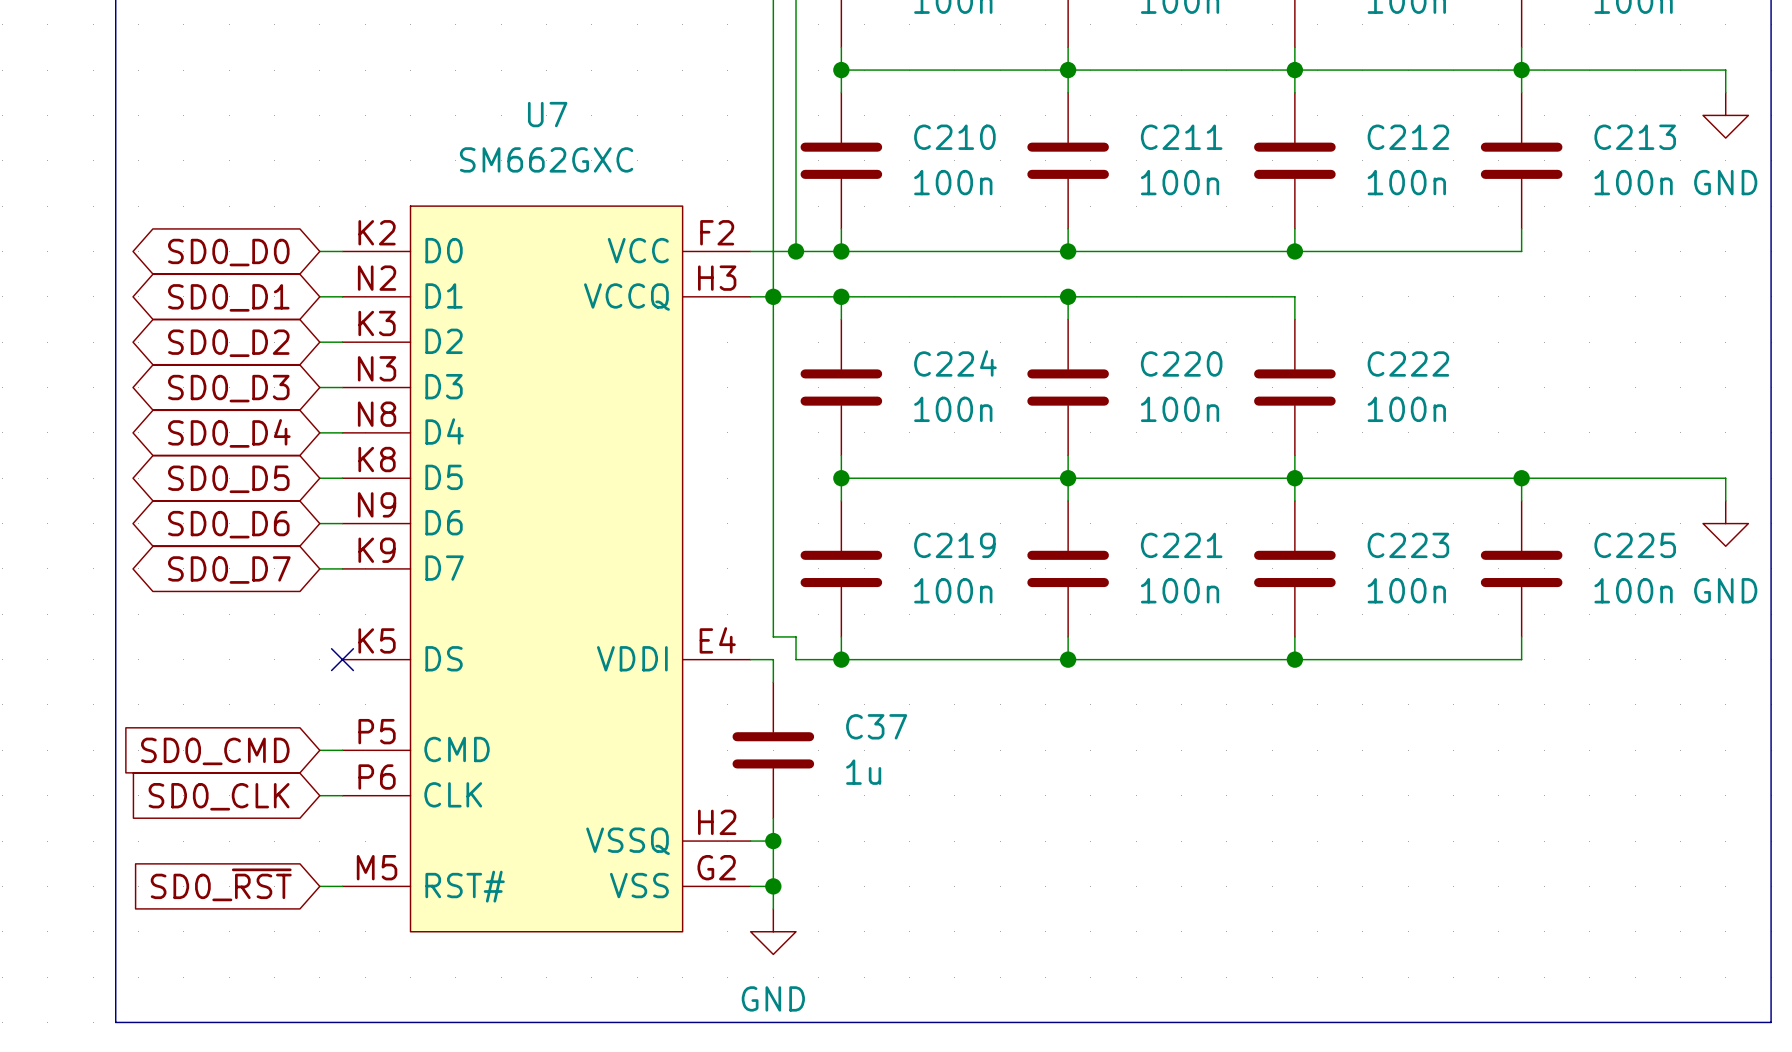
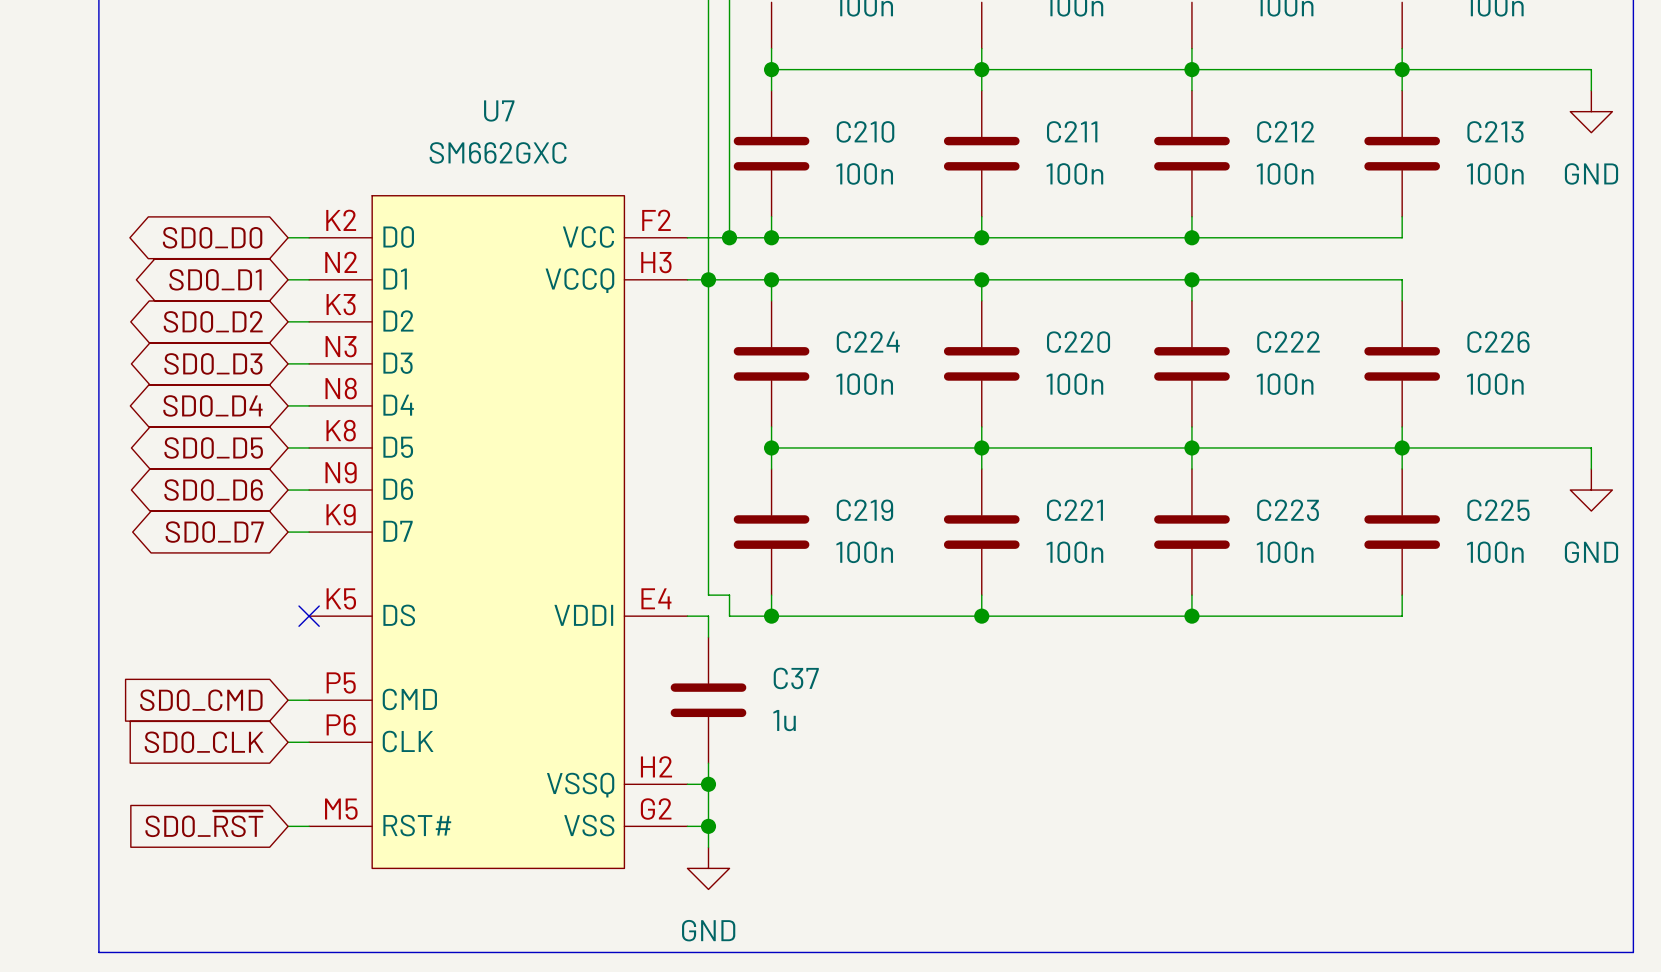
wire: none -> (1191, 279) (1402, 279) (1402, 300)
junction: none -> (1191, 279)
C226: none -> 100n (1402, 363)
wire: none -> (1402, 426) (1402, 447)

